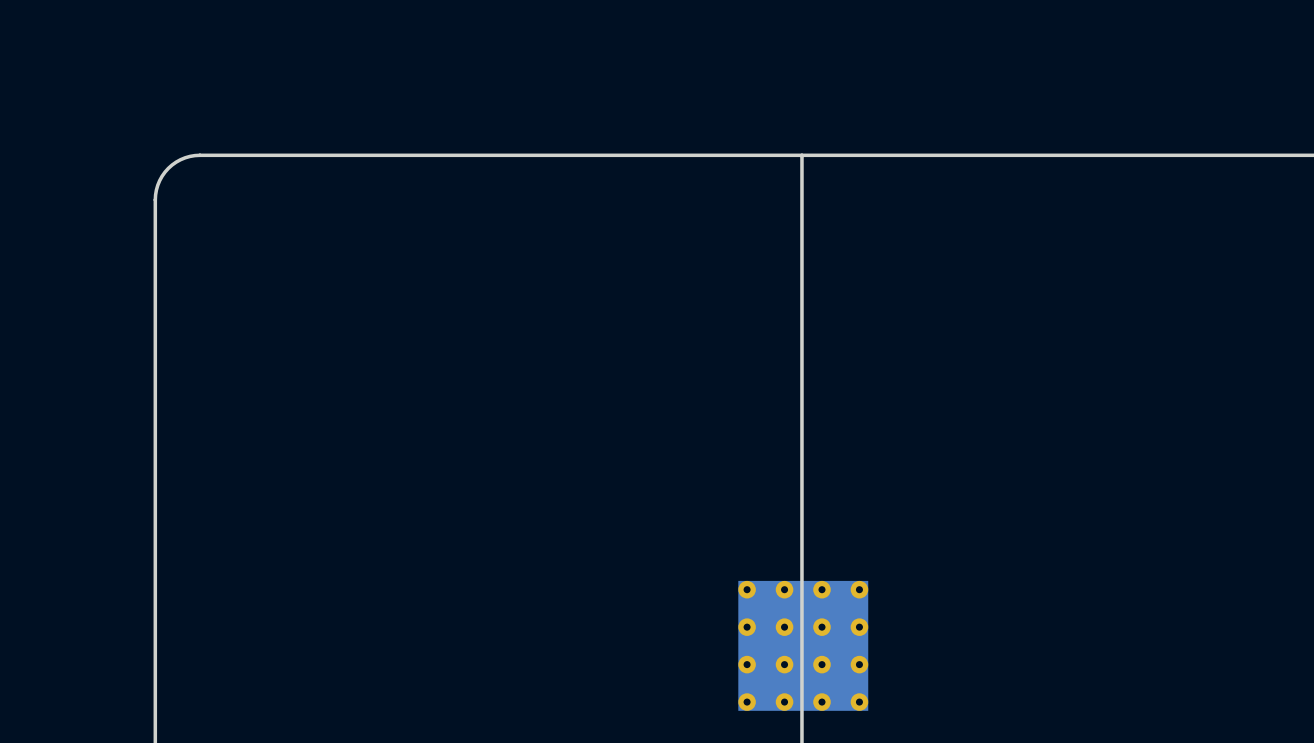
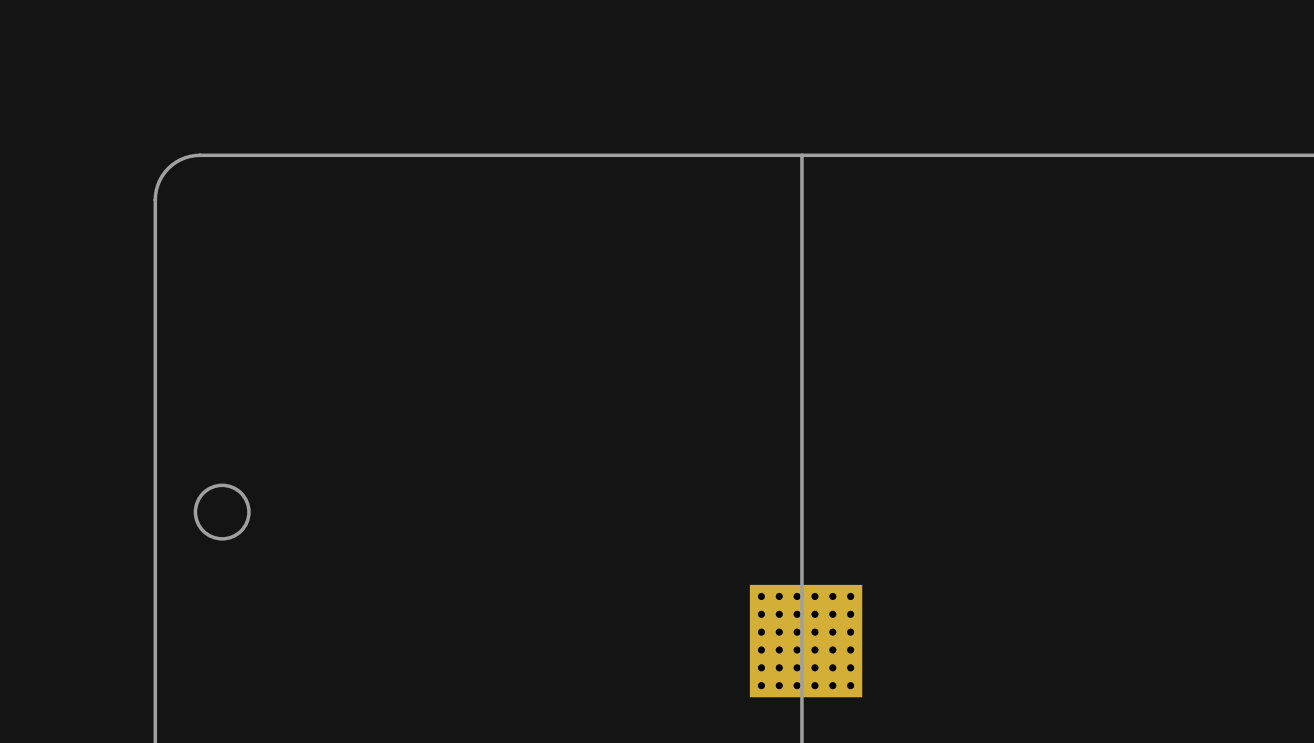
round board edge: none -> [193, 483, 251, 541]
part footprint: [738, 580, 869, 711] -> [749, 584, 863, 698]

